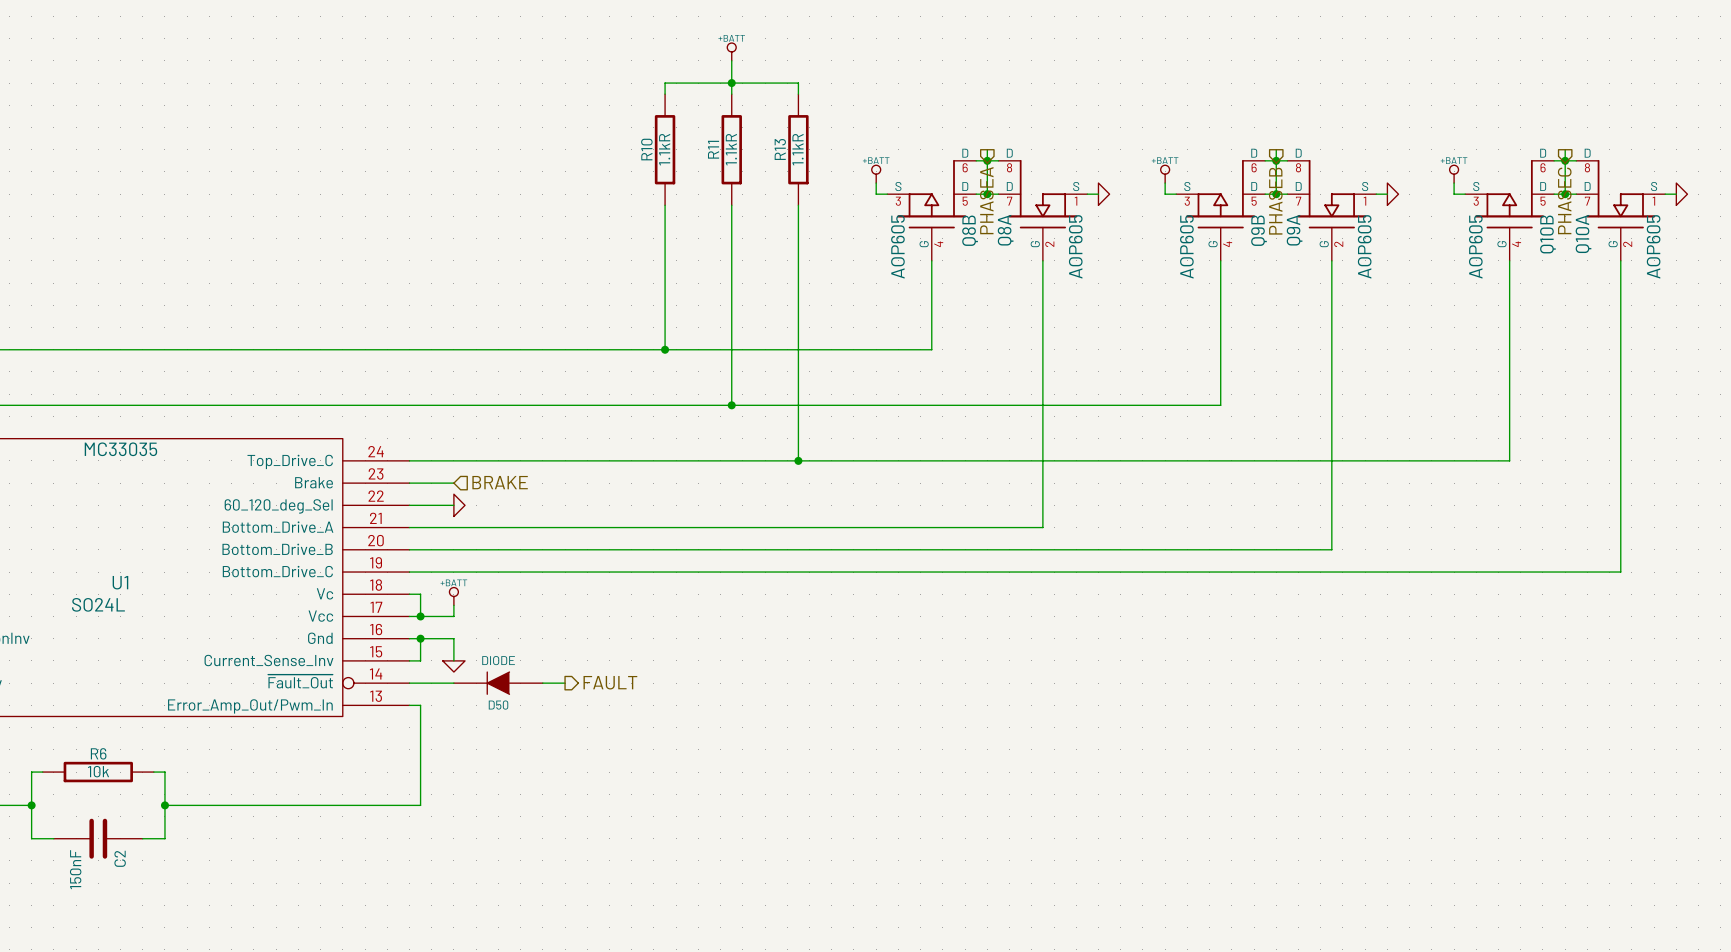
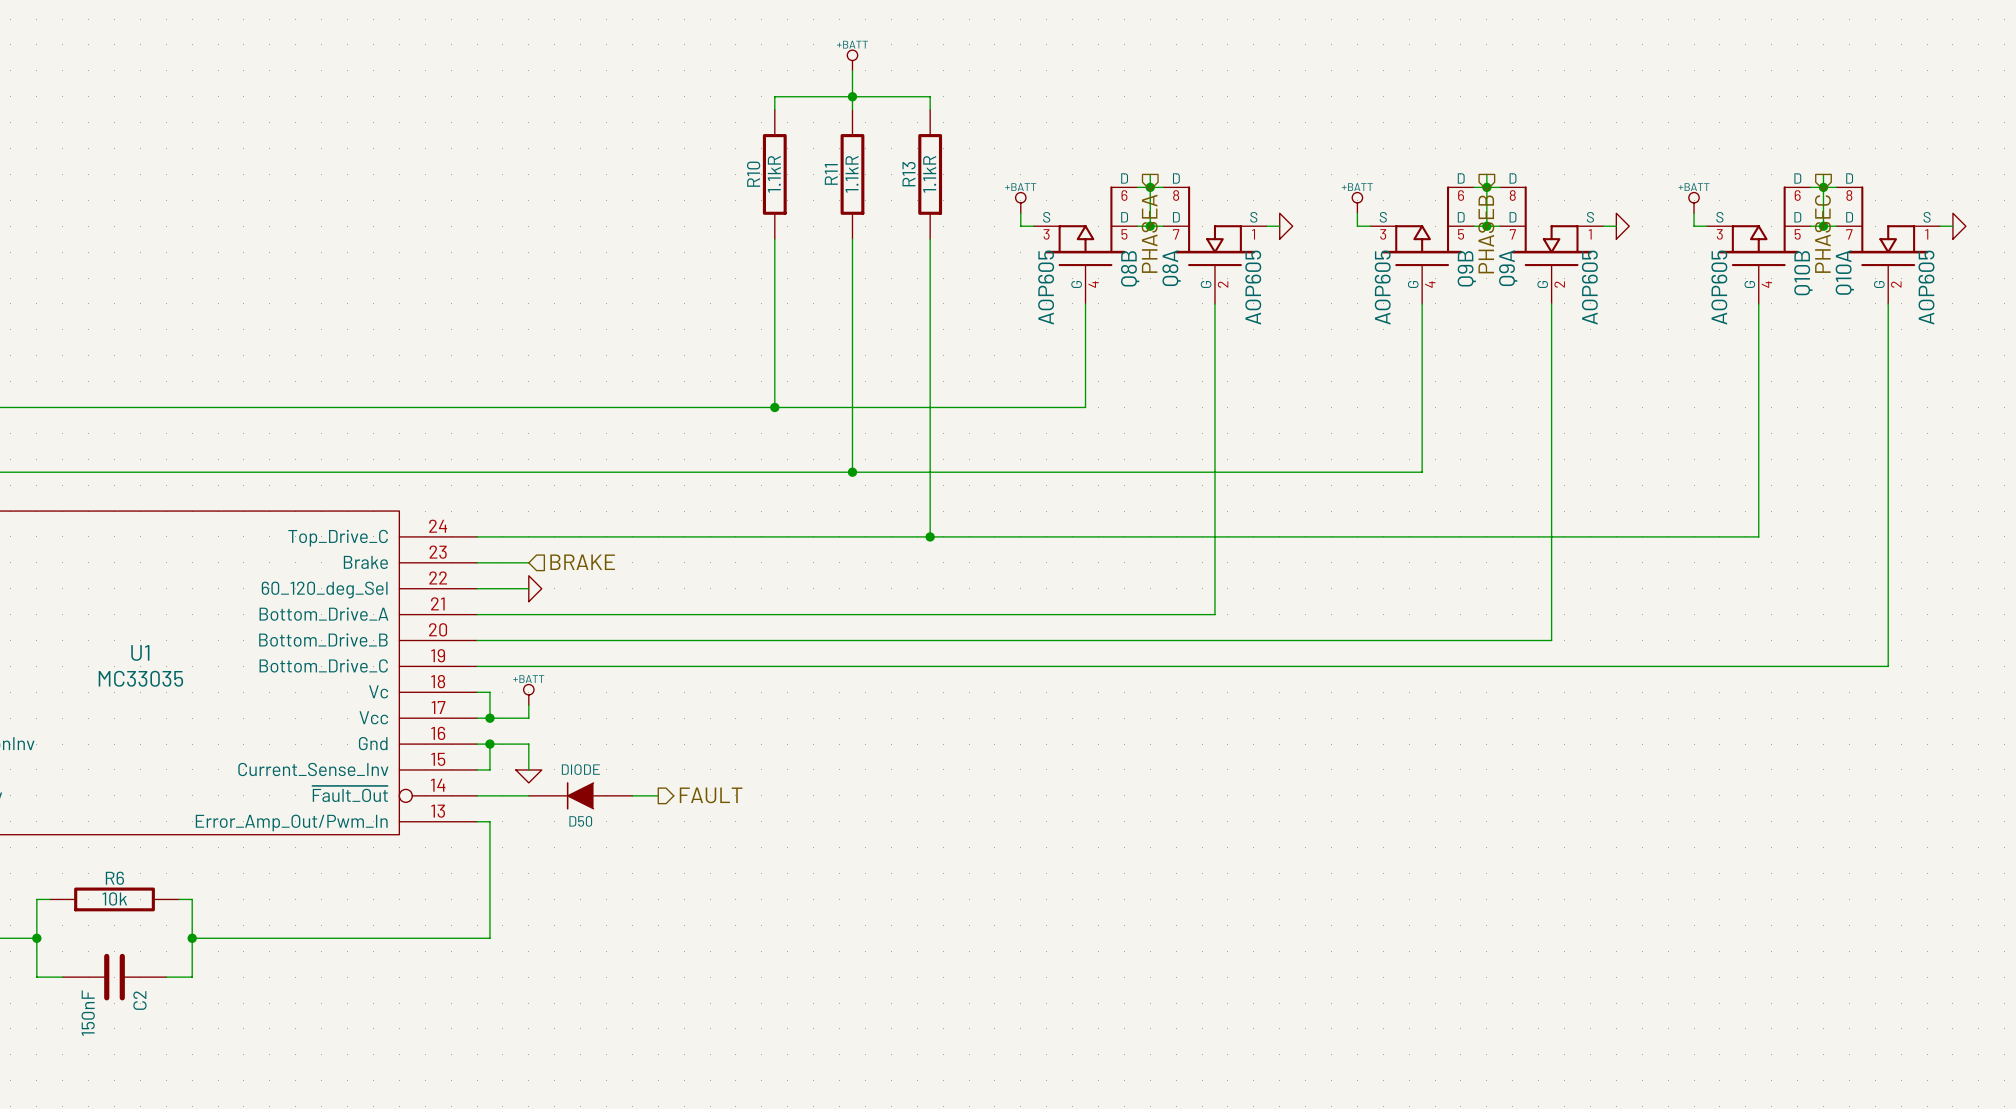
U1 value position: MC33035 (120, 449) -> MC33035 (140, 678)
U1 name position: U1 (120, 582) -> U1 (140, 652)
U1 text: SO24L (98, 604) -> none

